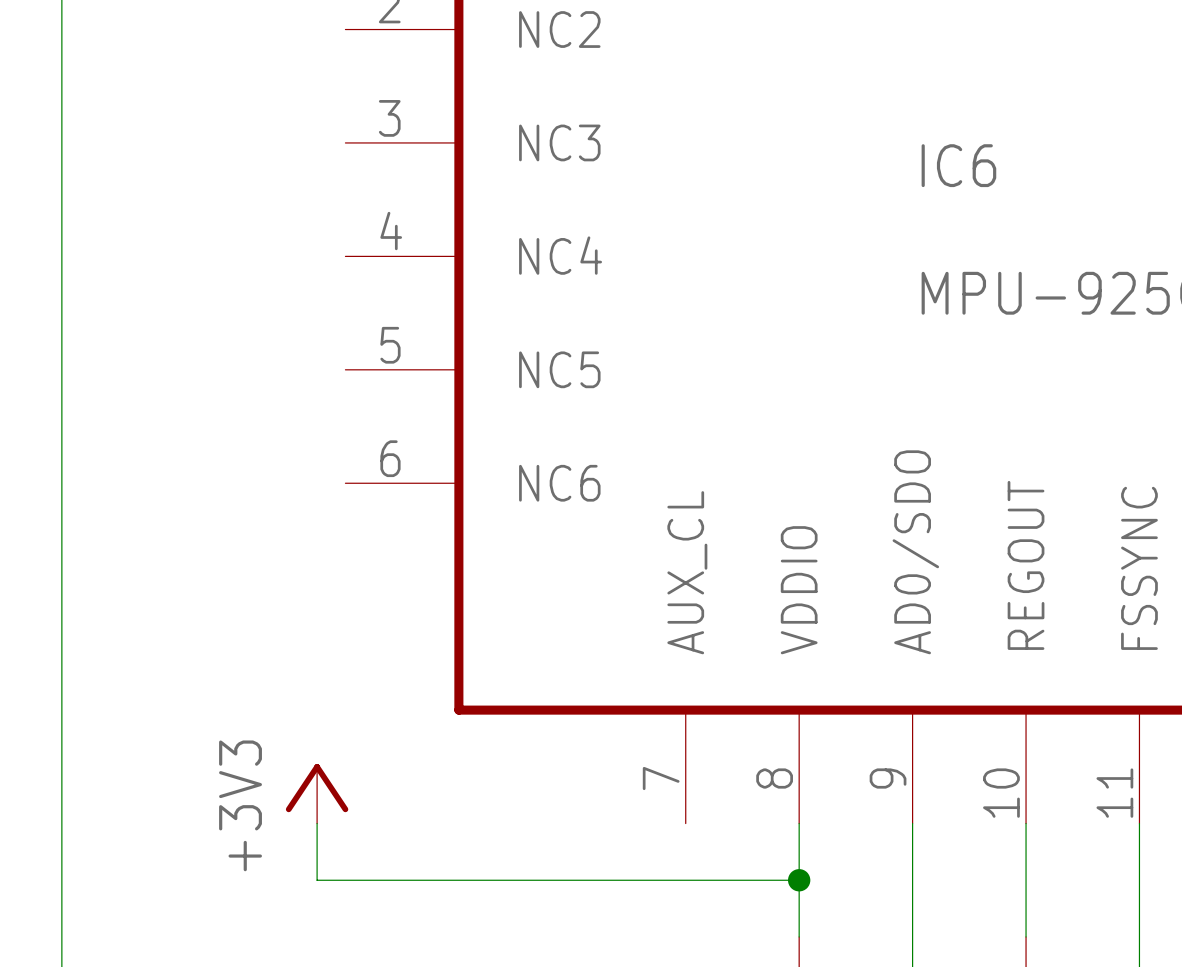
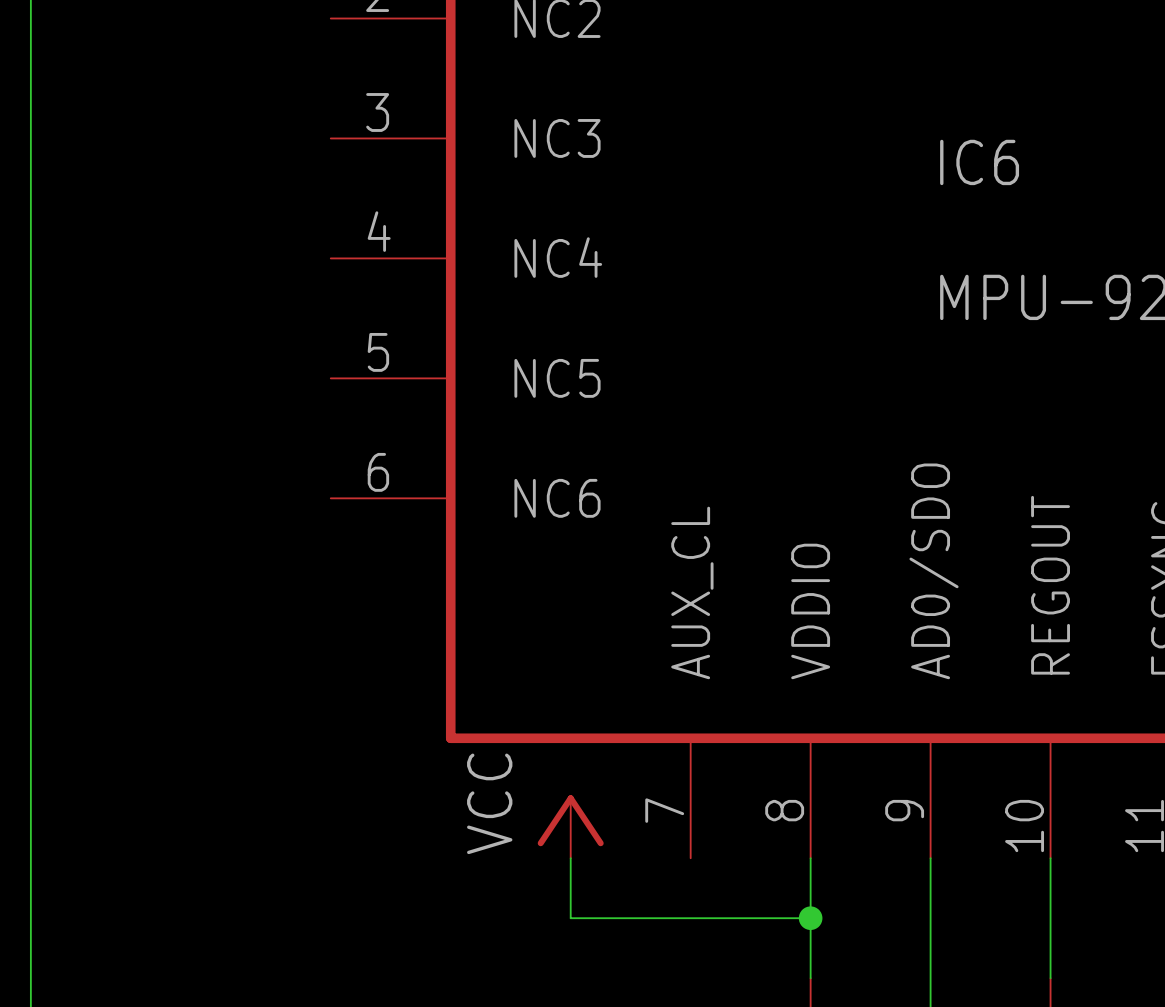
power symbol: +3V3 (317, 793) -> none
power symbol: none -> VCC (570, 826)
wire: (317, 823) (317, 880) (572, 880) -> (570, 858) (570, 918)

